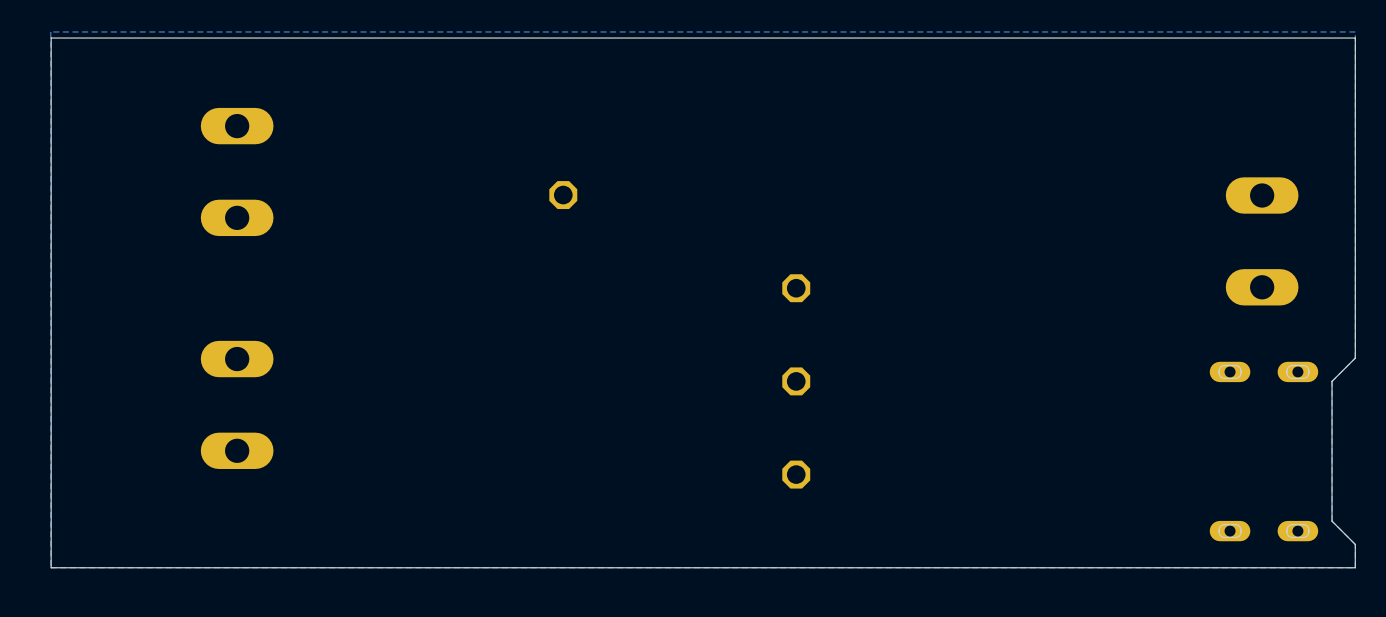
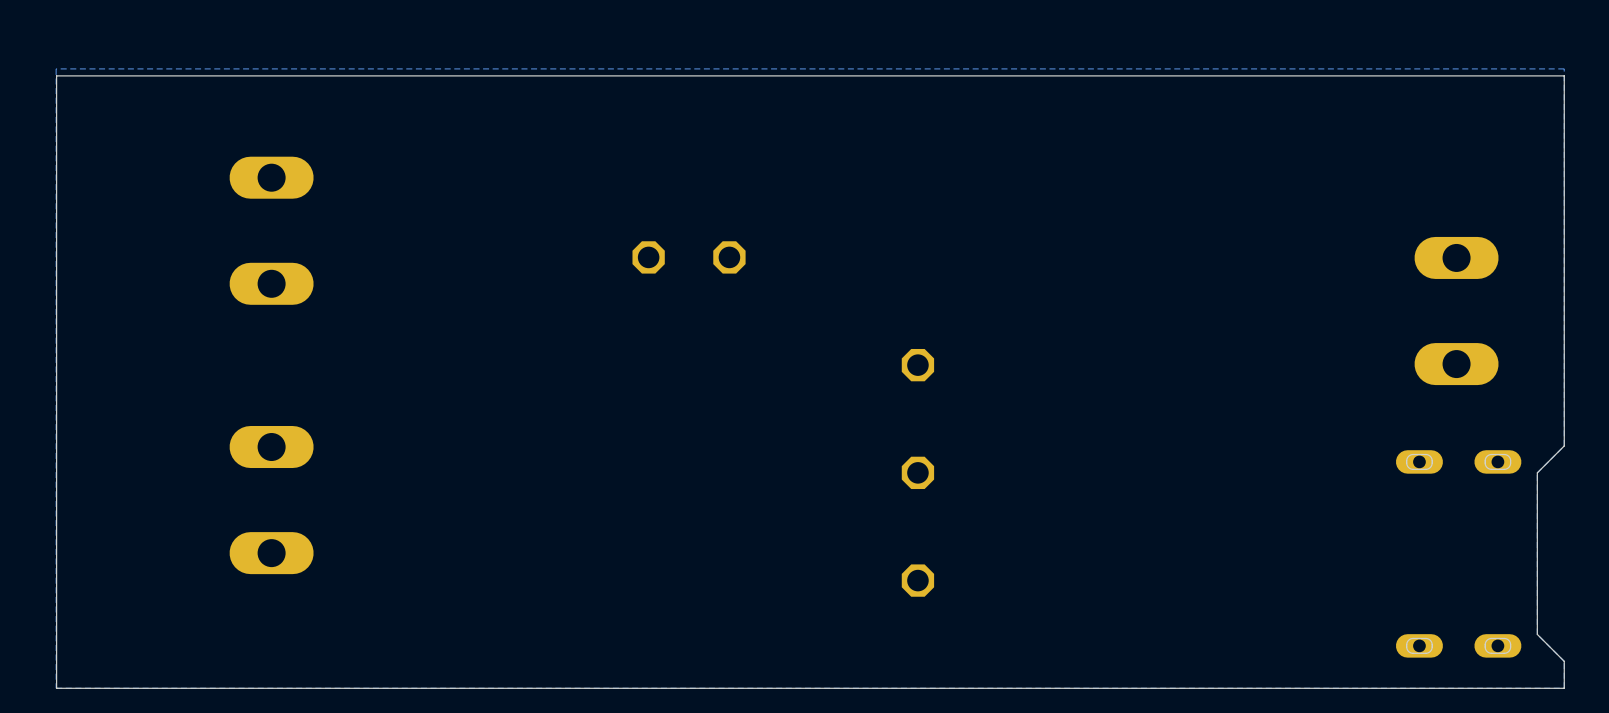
part: none -> (729, 257)

